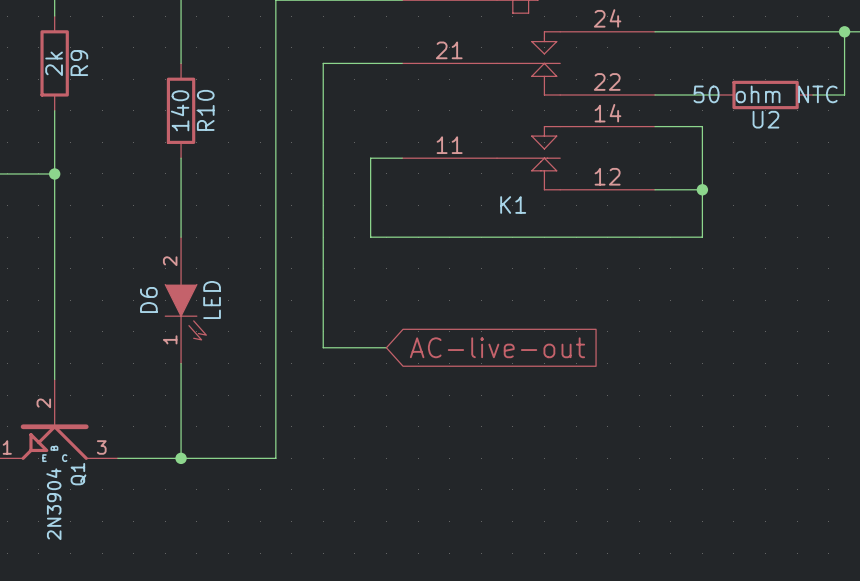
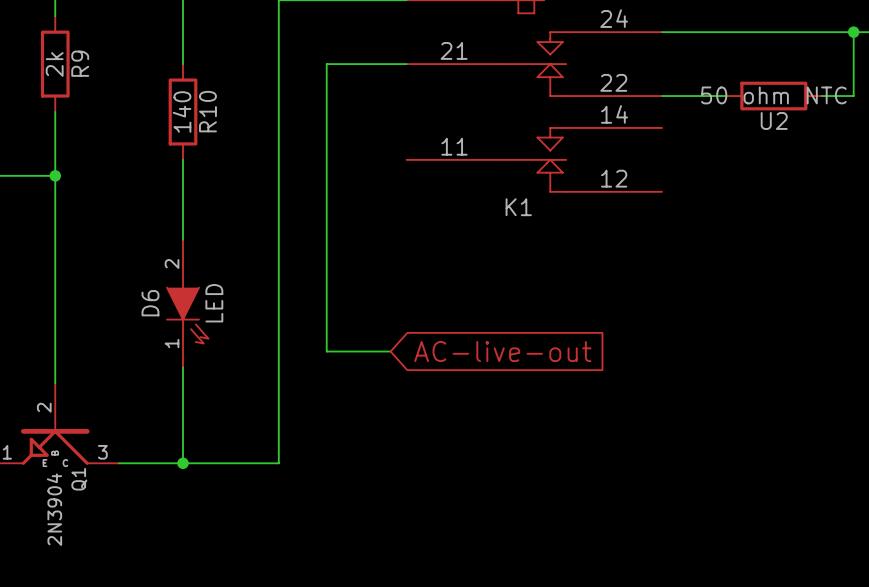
wire: (655, 126) (702, 126) (702, 237) (370, 237) (370, 158) (402, 158) -> none
wire: (655, 189) (702, 189) -> none
junction: (702, 189) -> none

